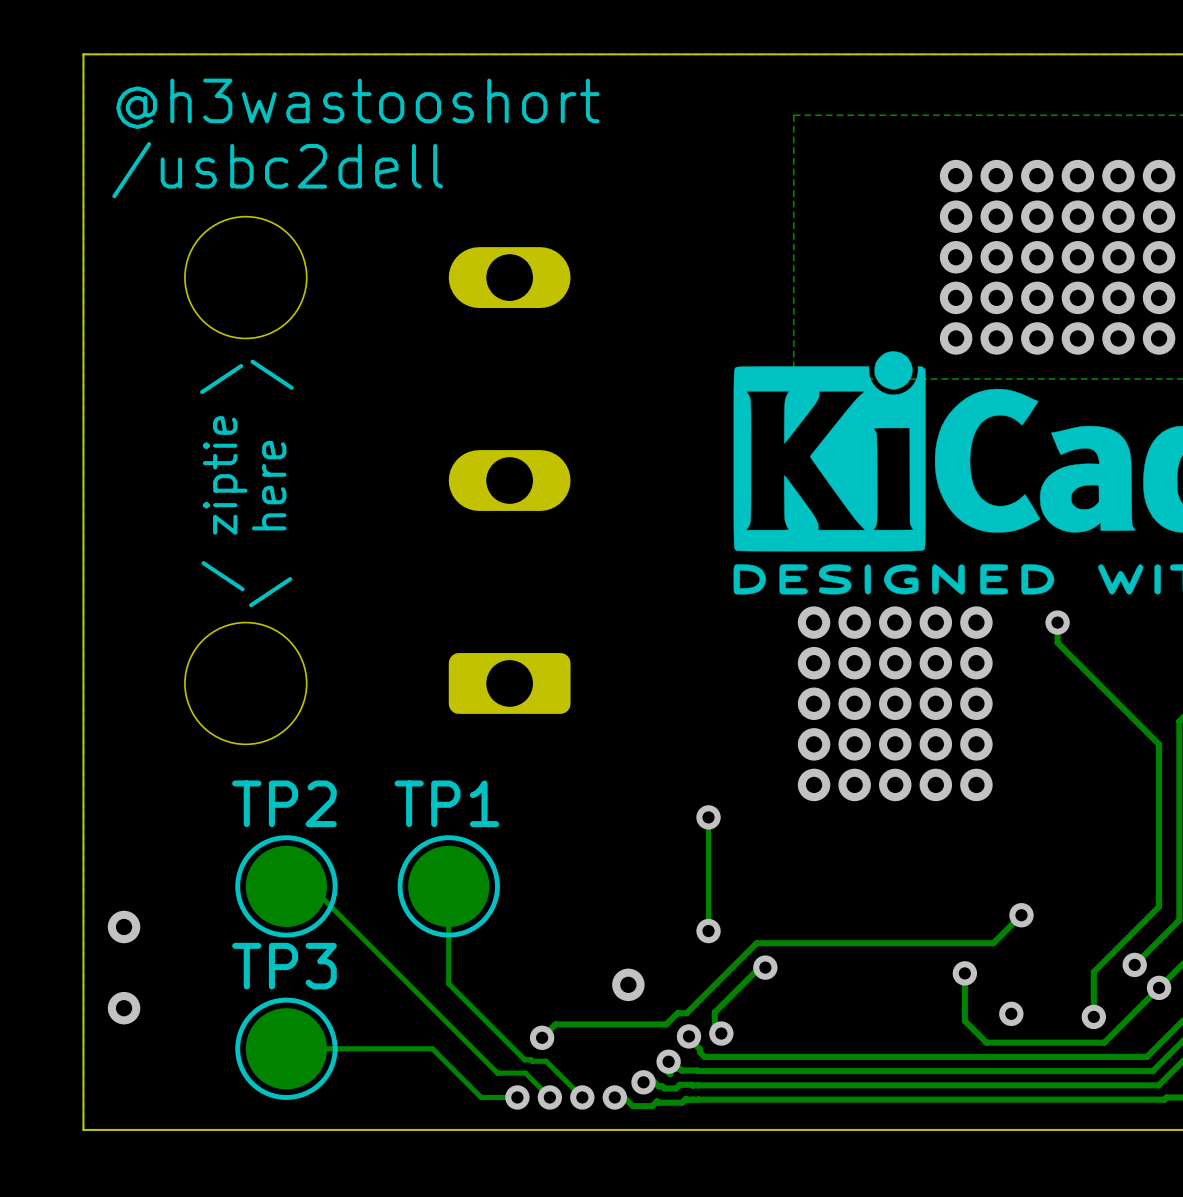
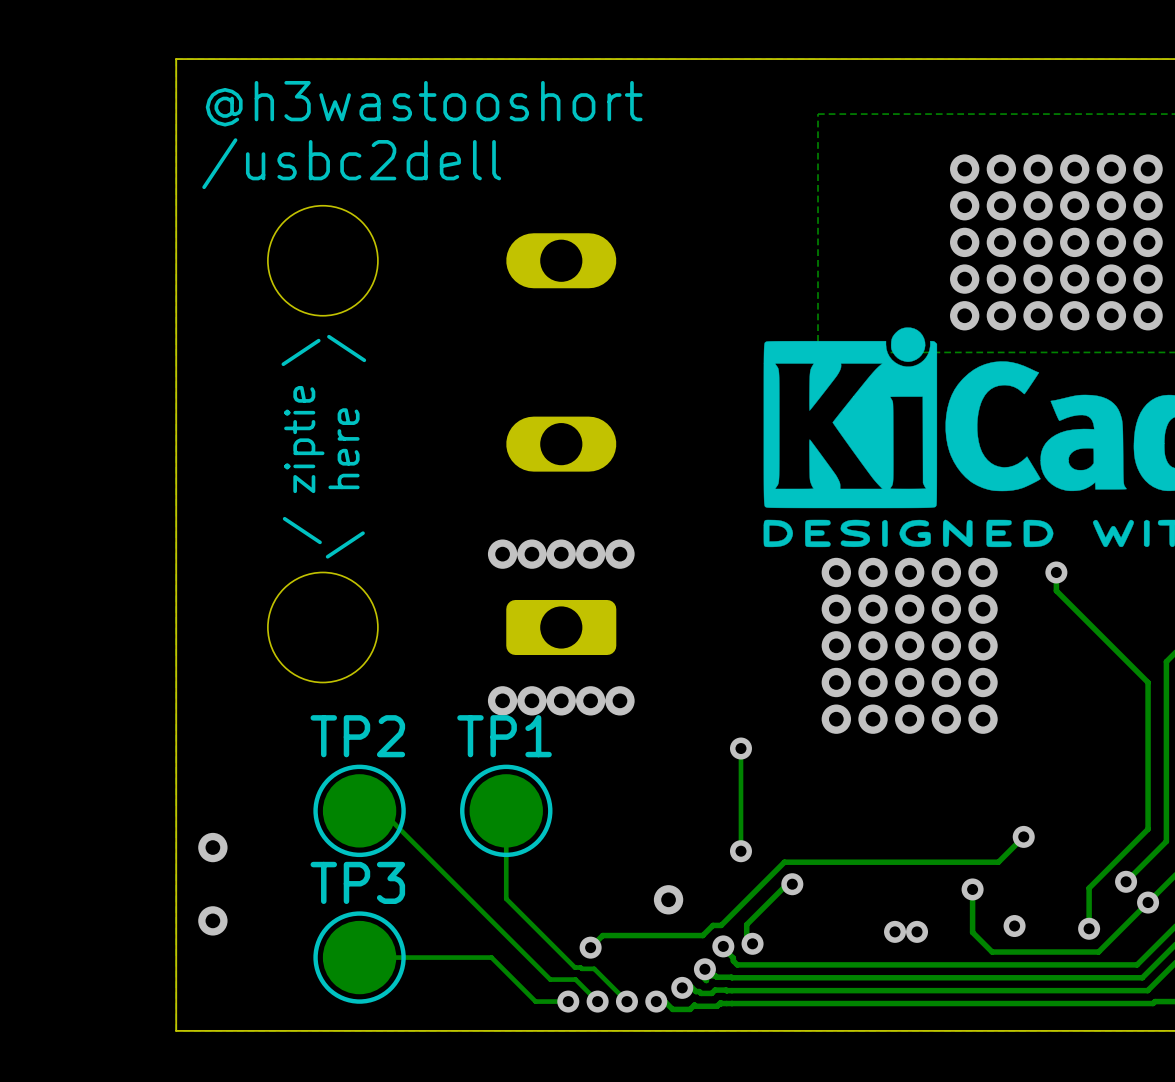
via: none -> (502, 554)
via: none -> (531, 554)
via: none -> (561, 554)
via: none -> (590, 554)
via: none -> (619, 554)
via: none -> (502, 700)
via: none -> (531, 700)
via: none -> (561, 700)
via: none -> (590, 700)
via: none -> (619, 700)
via: none -> (895, 931)
via: none -> (917, 931)

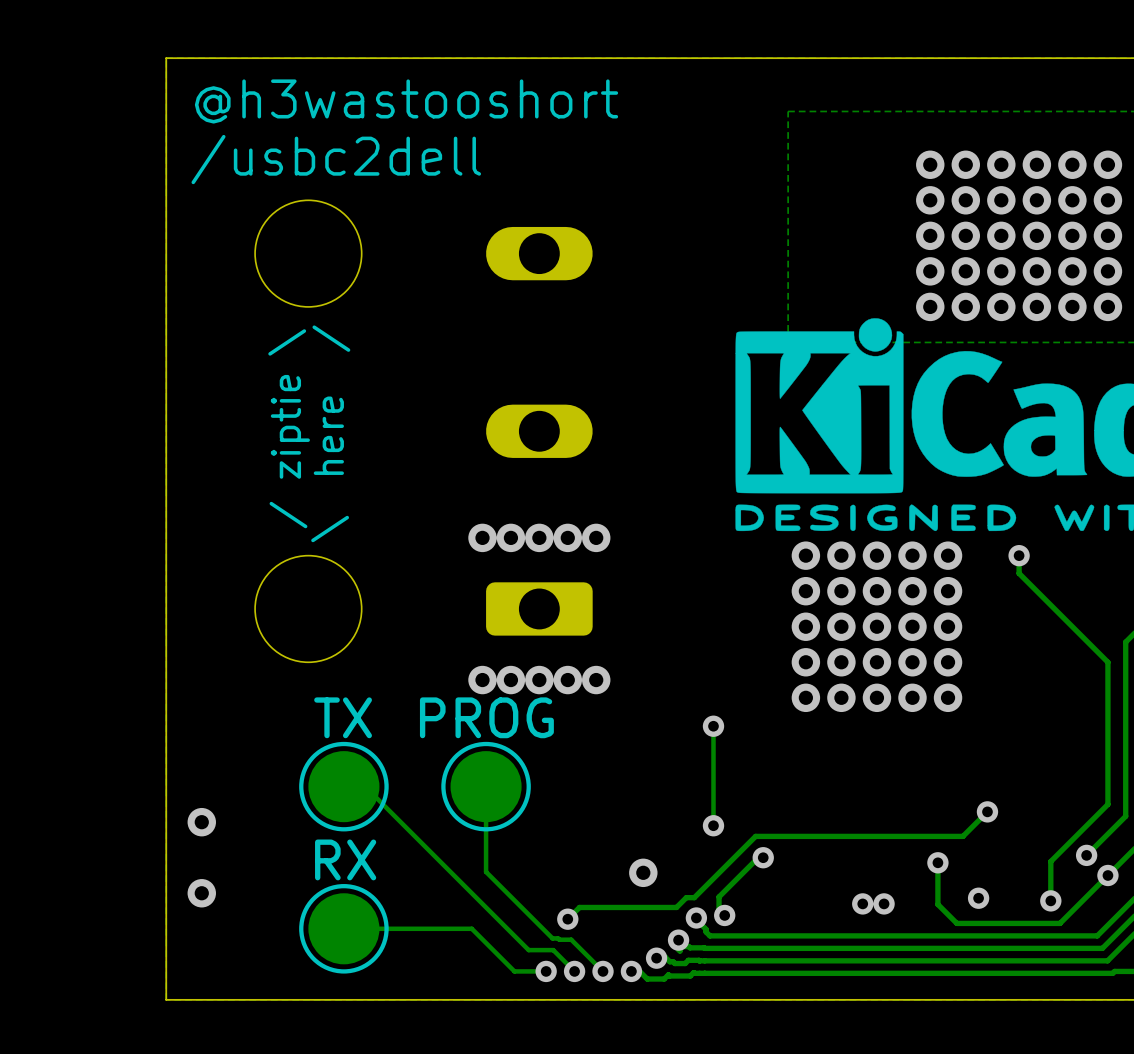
TP2 name: TP2 (357, 736) -> none
TP1 name: TP1 (504, 736) -> none
TP2 value: none -> TX (343, 717)
TP1 value: none -> PROG (486, 717)
TP3 name: TP3 (357, 882) -> none
TP3 value: none -> RX (345, 859)

